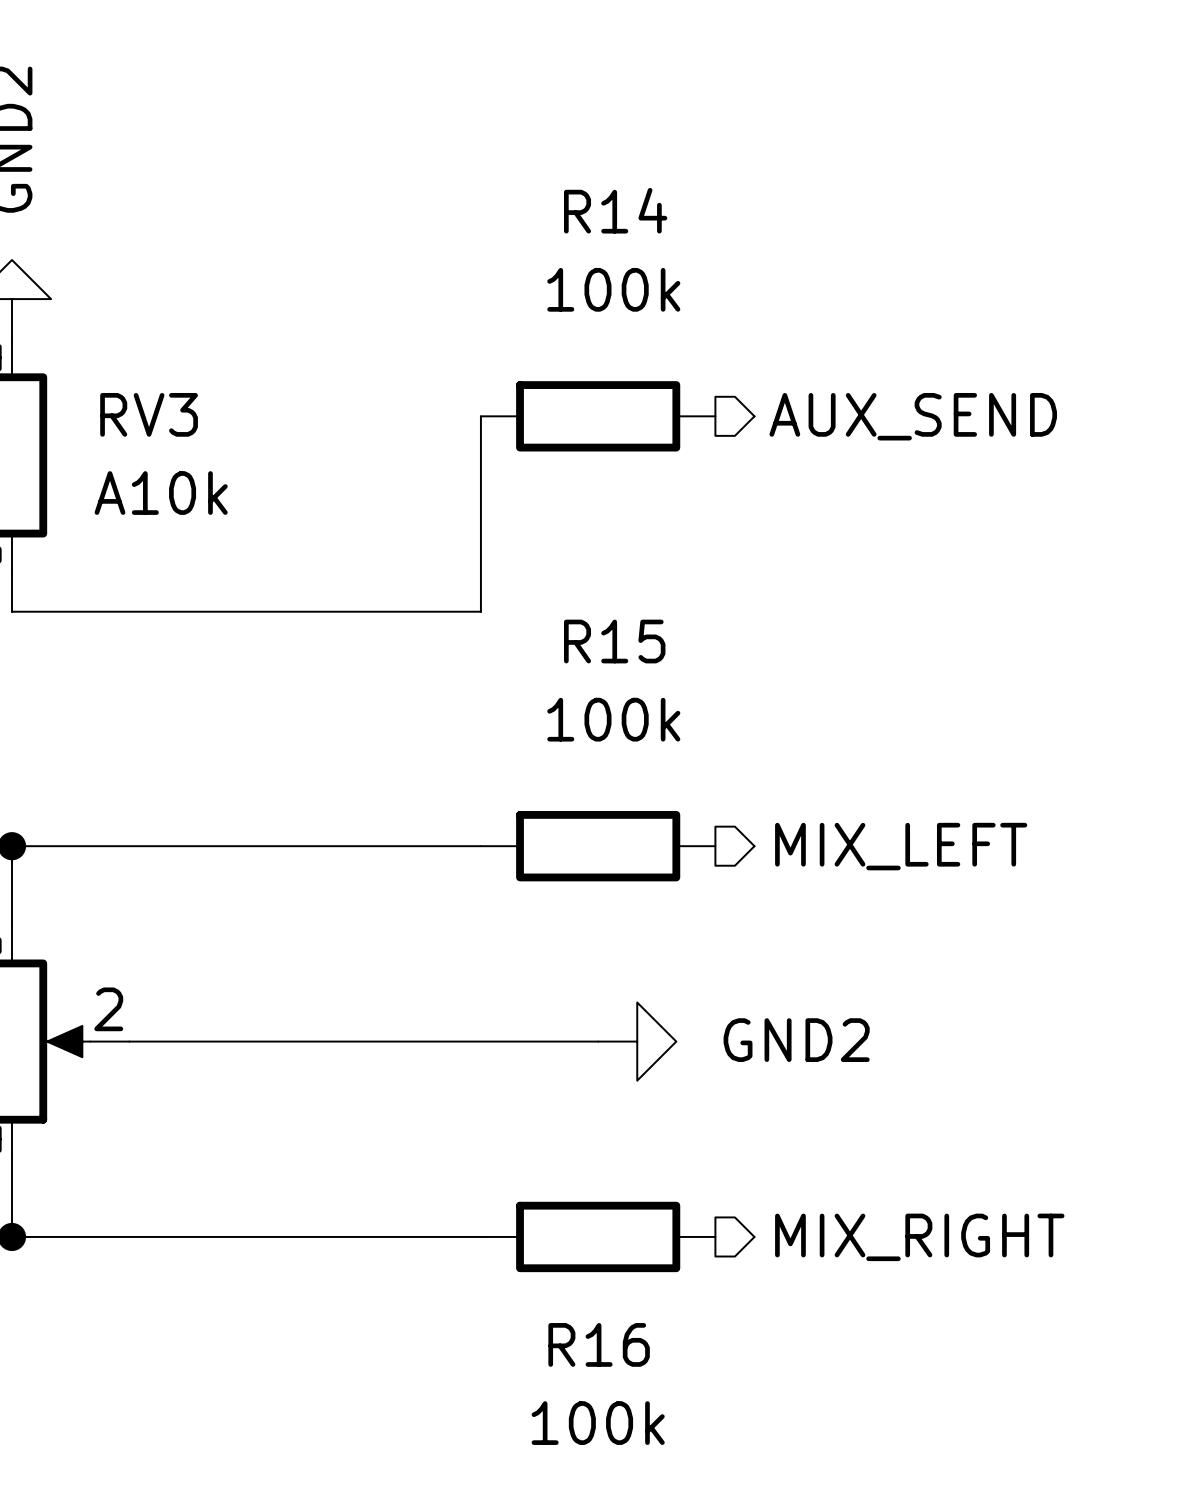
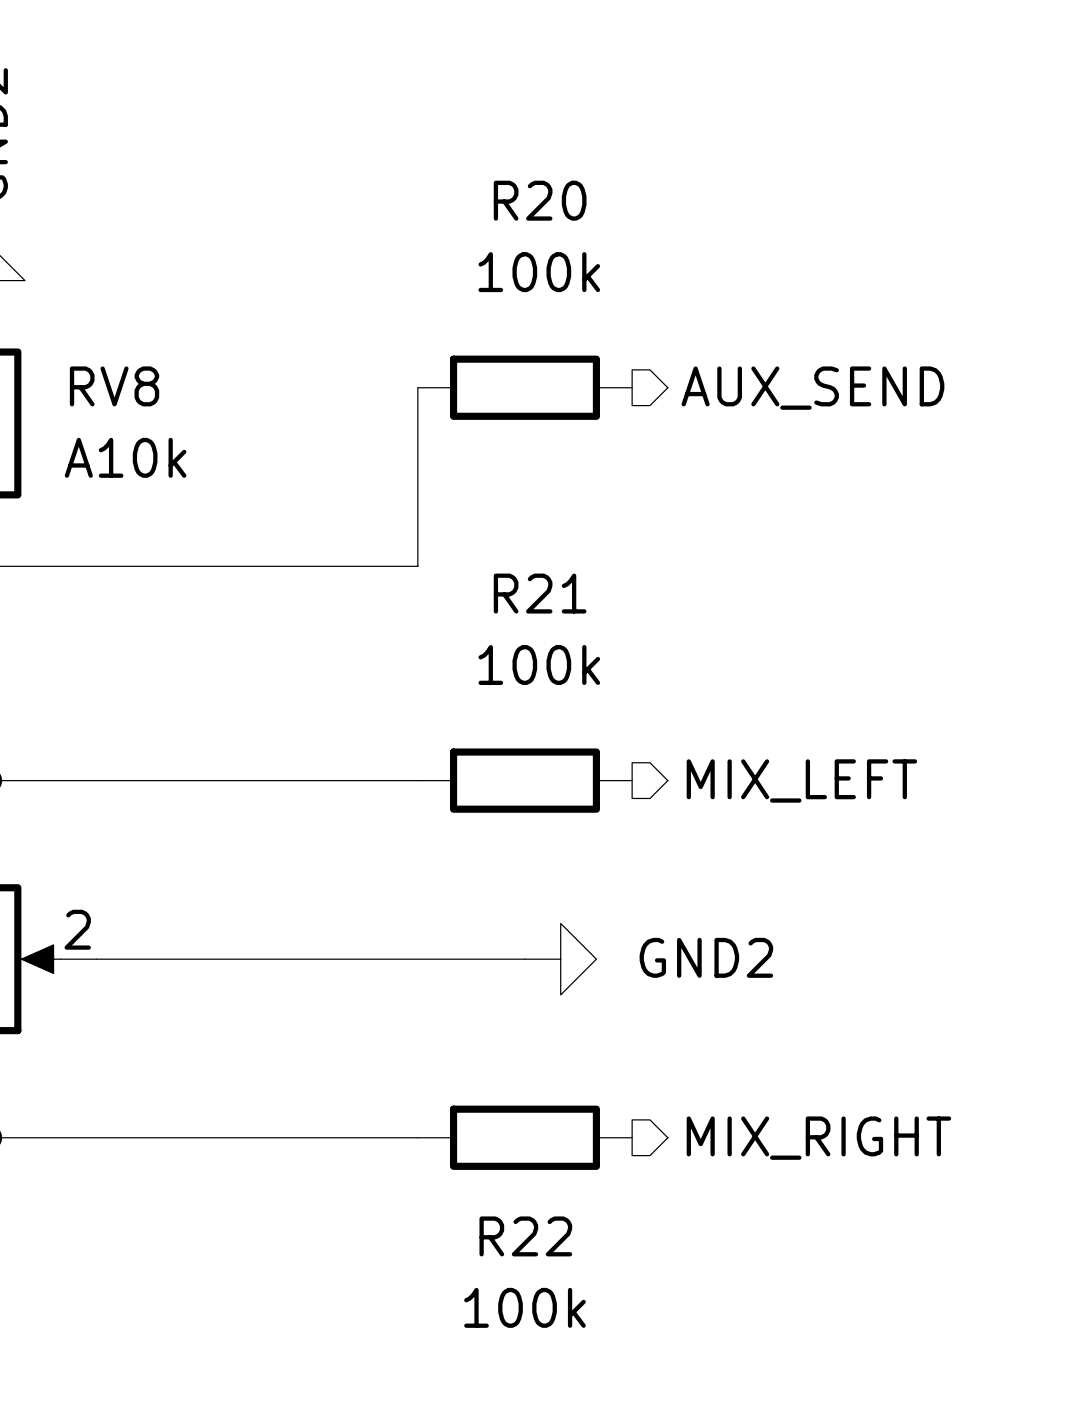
R14 name: R14 (615, 210) -> R20 (540, 200)
RV3 name: RV3 (149, 414) -> RV8 (114, 386)
R15 name: R15 (614, 641) -> R21 (540, 593)
R16 name: R16 (599, 1344) -> R22 (525, 1236)

